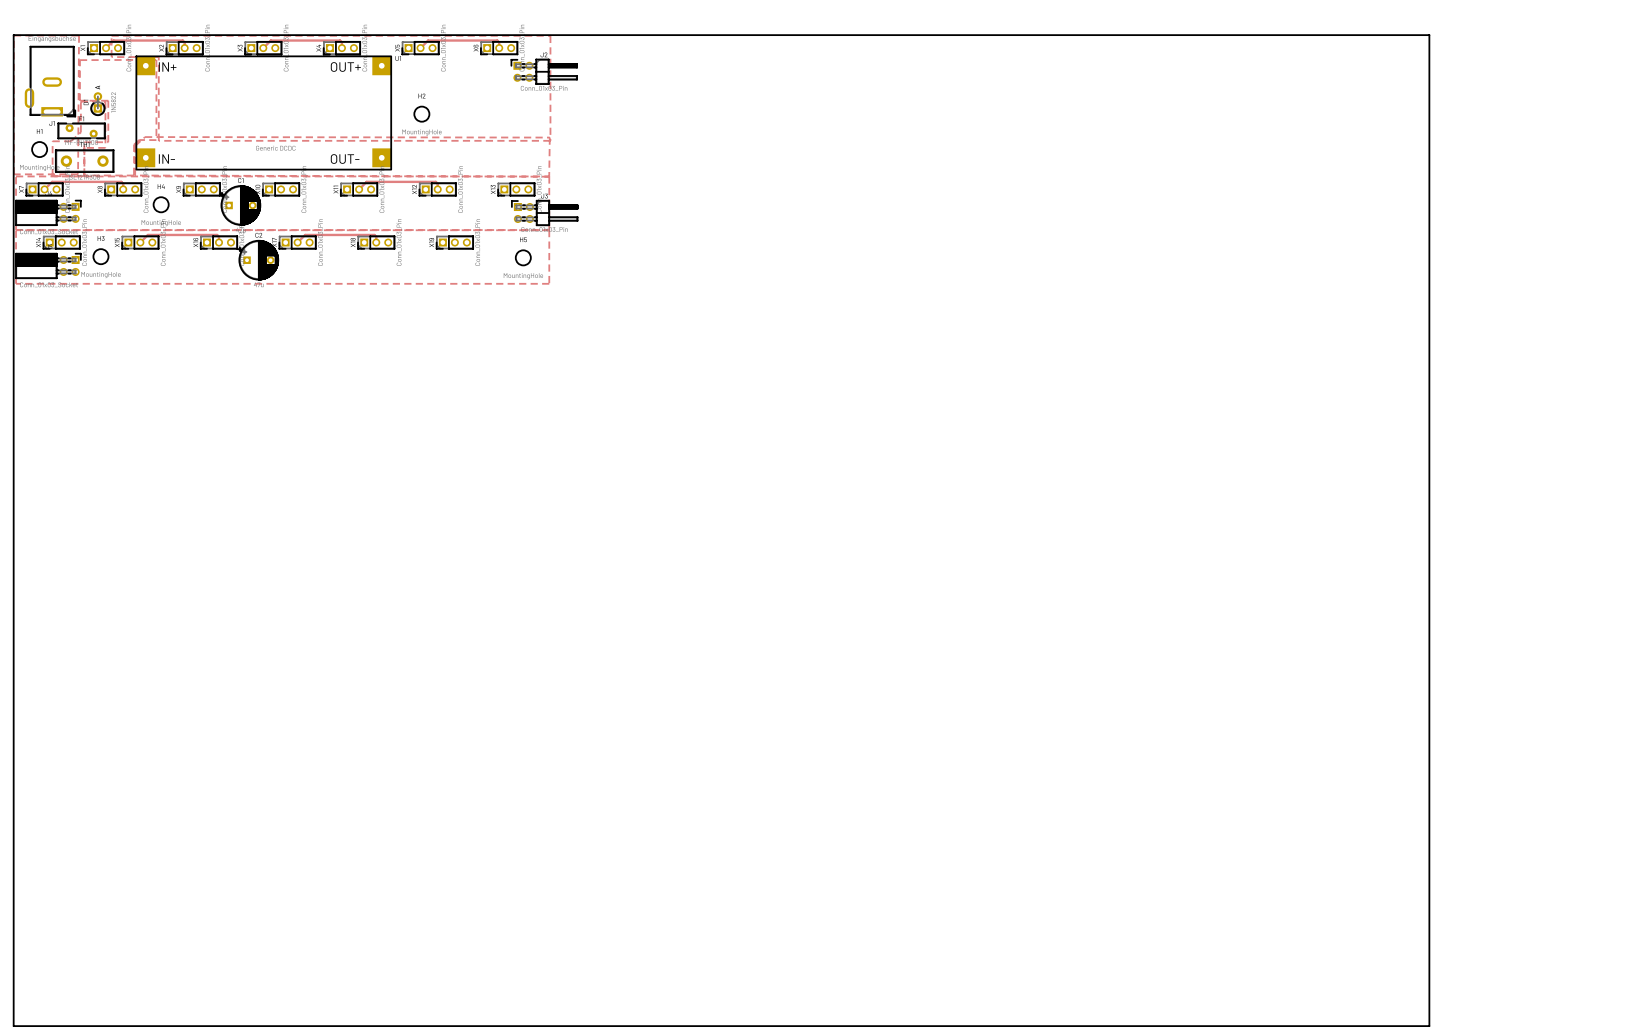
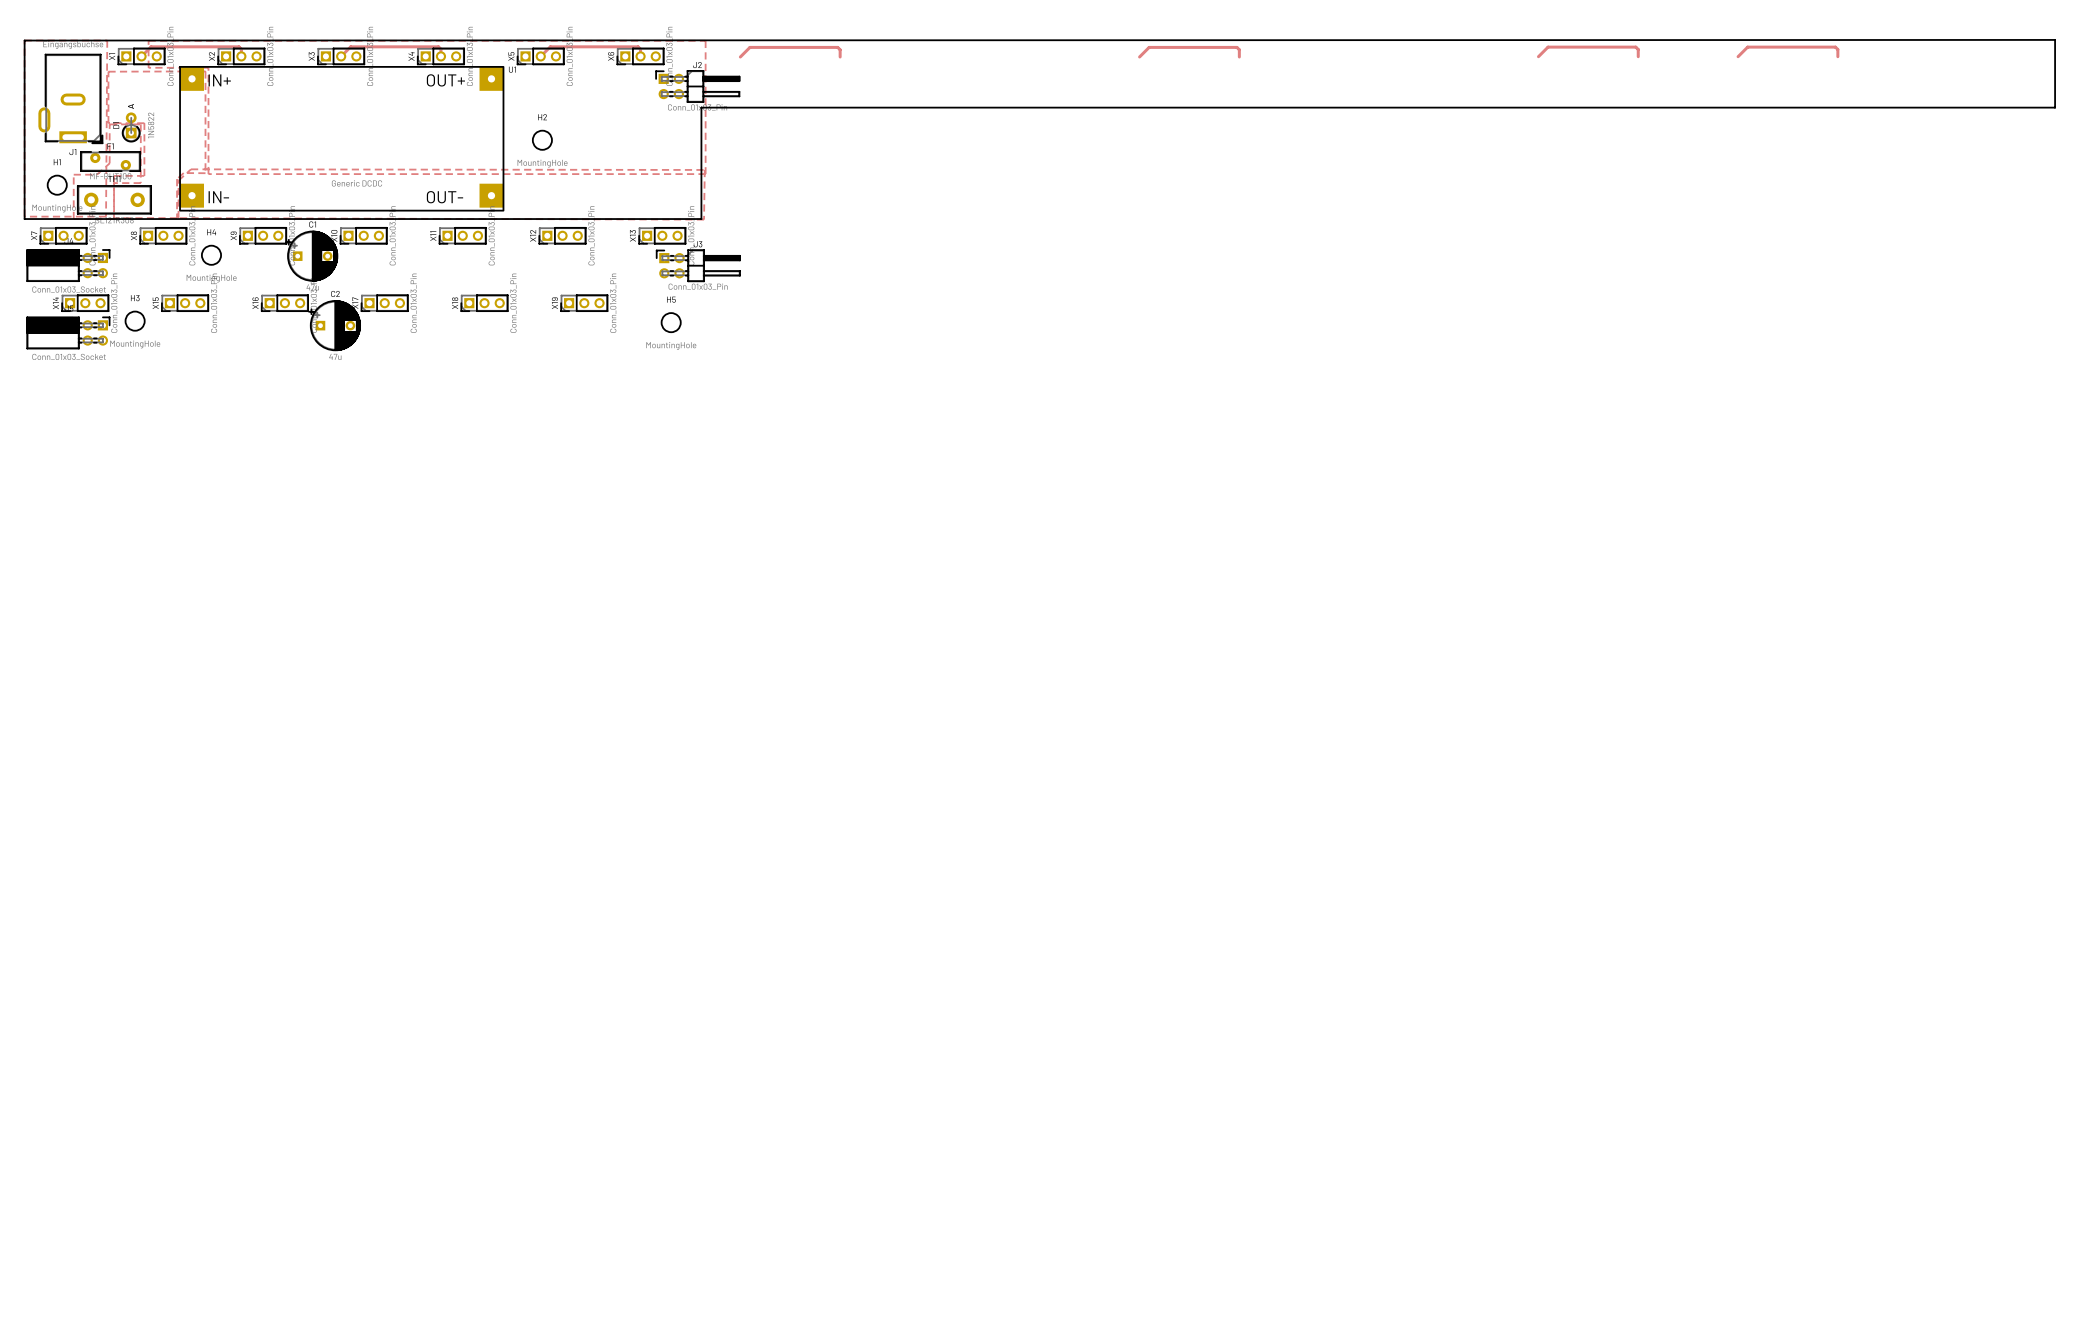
board edge: (13, 35) (1429, 35) (1429, 1026) (13, 1026) (13, 35) -> none
board edge: none -> (2055, 39) (2055, 107) (701, 107) (701, 219) (24, 219) (24, 40) (2055, 39)
track: none -> (740, 57) (749, 47) (837, 47) (840, 49) (840, 57)
track: none -> (1139, 57) (1149, 47) (1236, 47) (1239, 49) (1239, 57)
track: none -> (1538, 56) (1548, 47) (1635, 47) (1638, 49) (1638, 56)
track: none -> (1738, 56) (1747, 47) (1835, 47) (1837, 49) (1837, 56)
zone outline: (16, 176) (16, 283) (549, 283) (549, 176) (16, 176) -> none
track: (44, 189) (52, 181) (121, 181) (123, 189) -> none
track: (359, 189) (366, 181) (435, 181) (437, 189) -> none
zone outline: (16, 230) (549, 230) -> none
track: (140, 242) (147, 234) (217, 234) (218, 242) -> none
track: (297, 242) (305, 234) (374, 234) (376, 242) -> none

